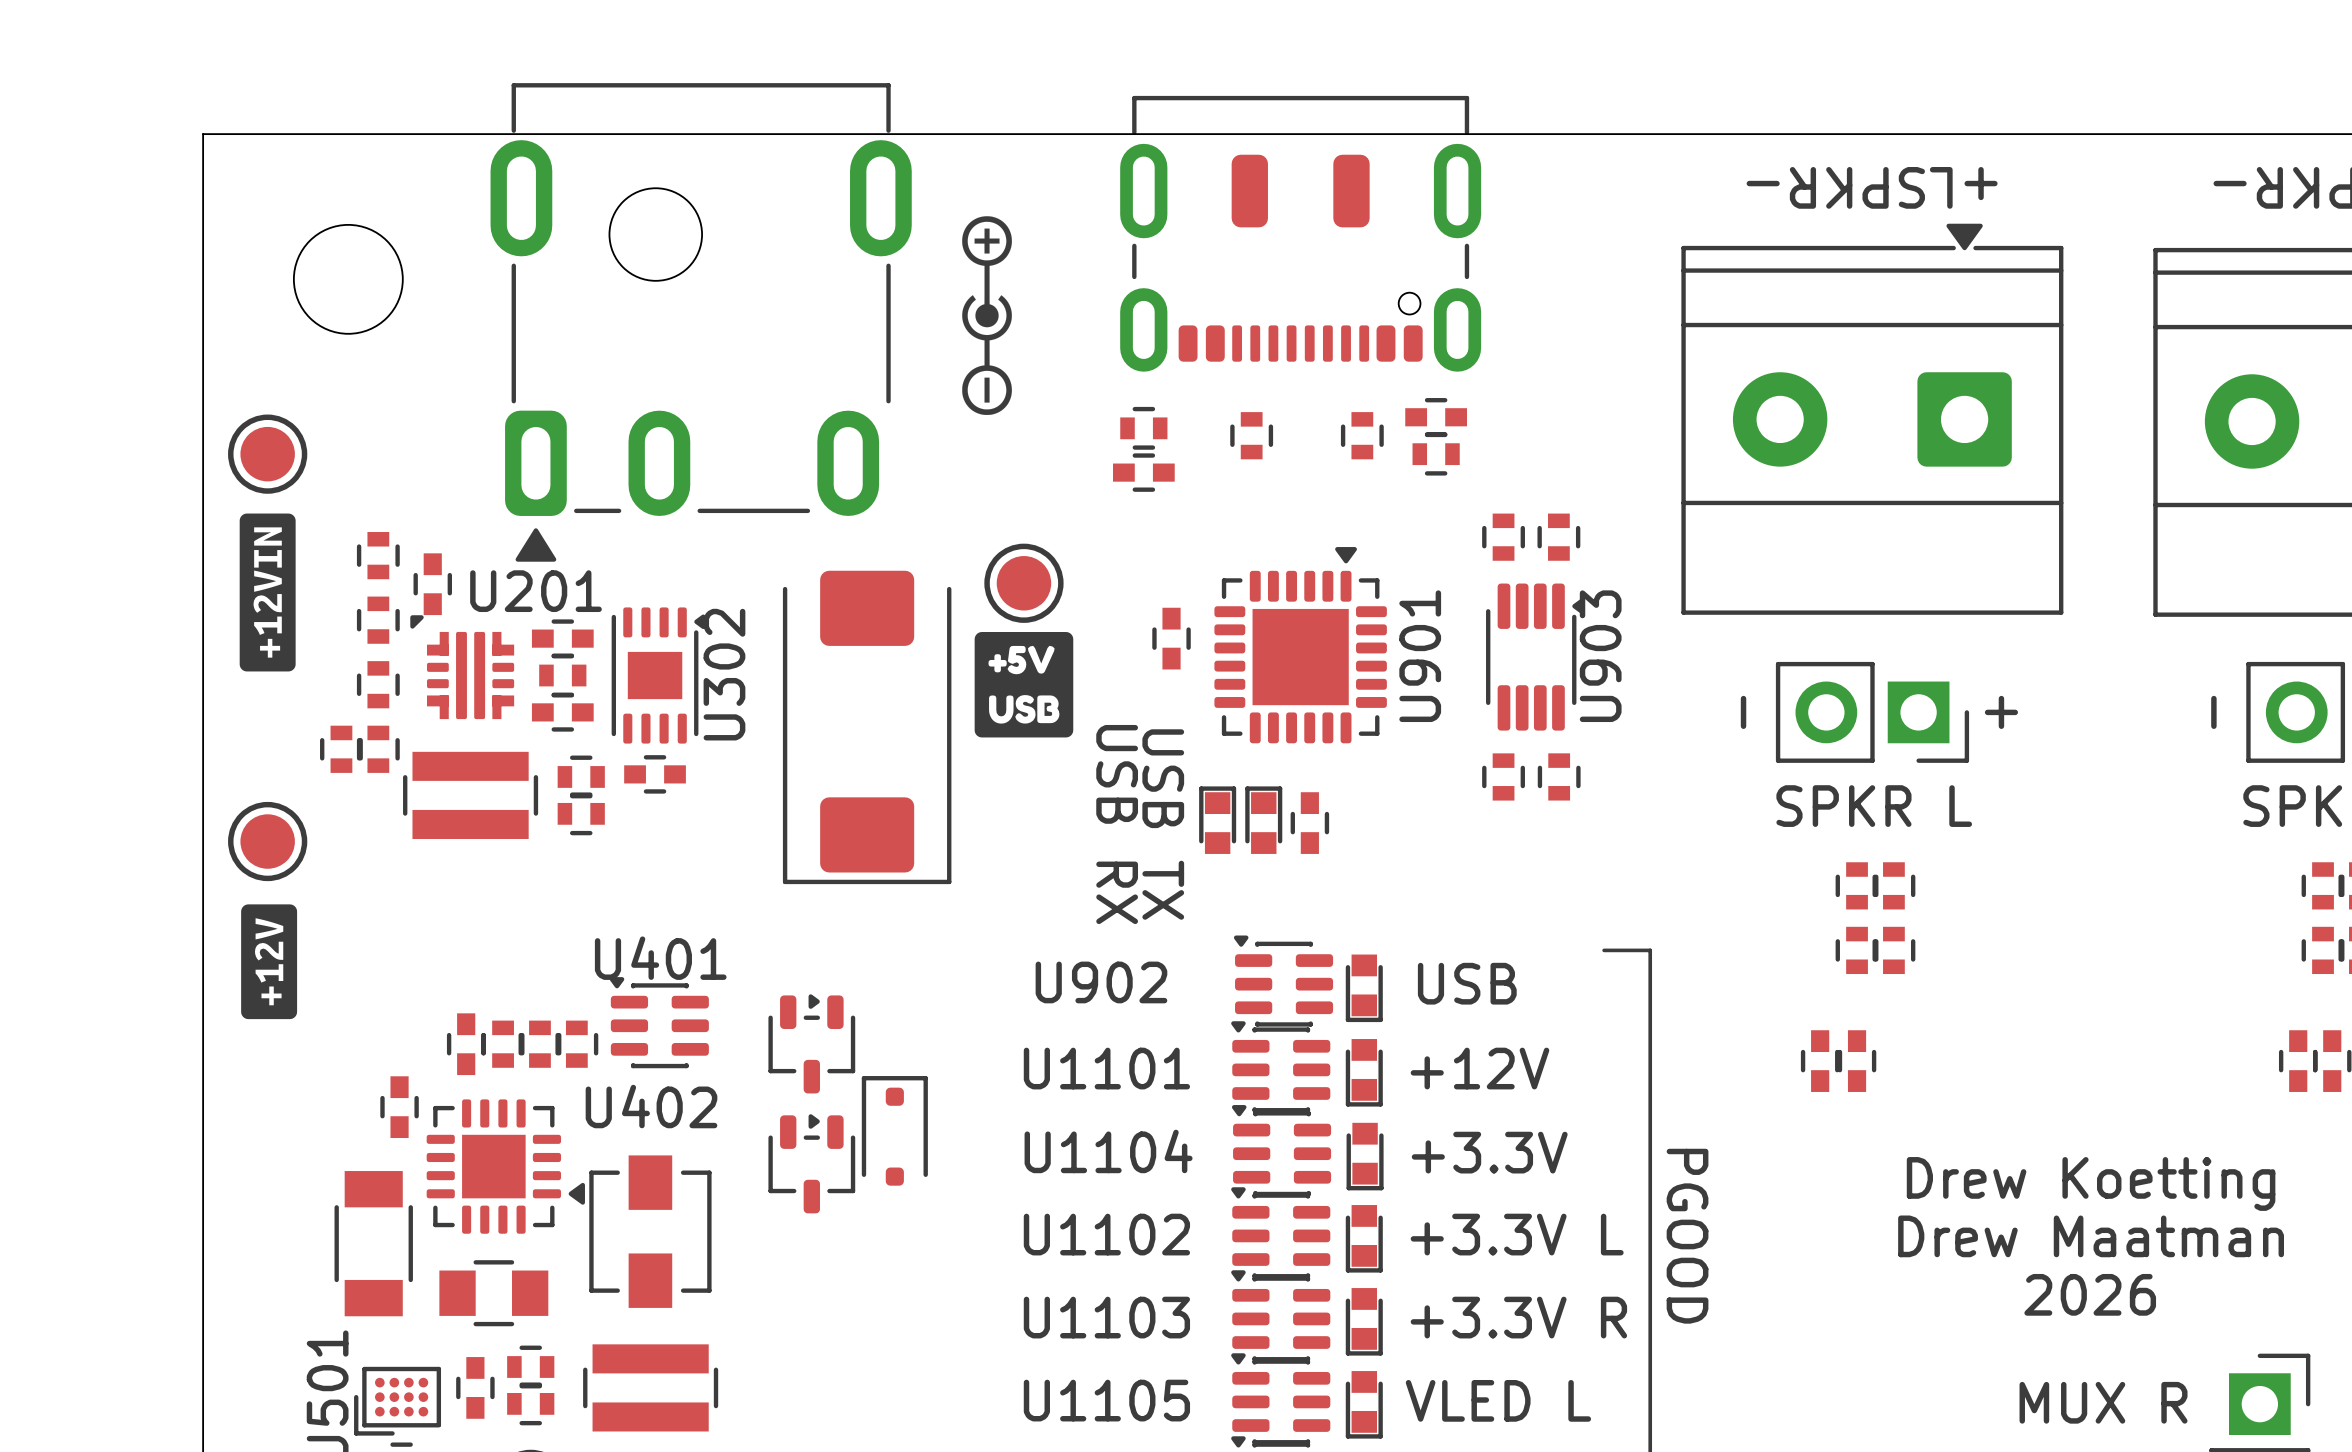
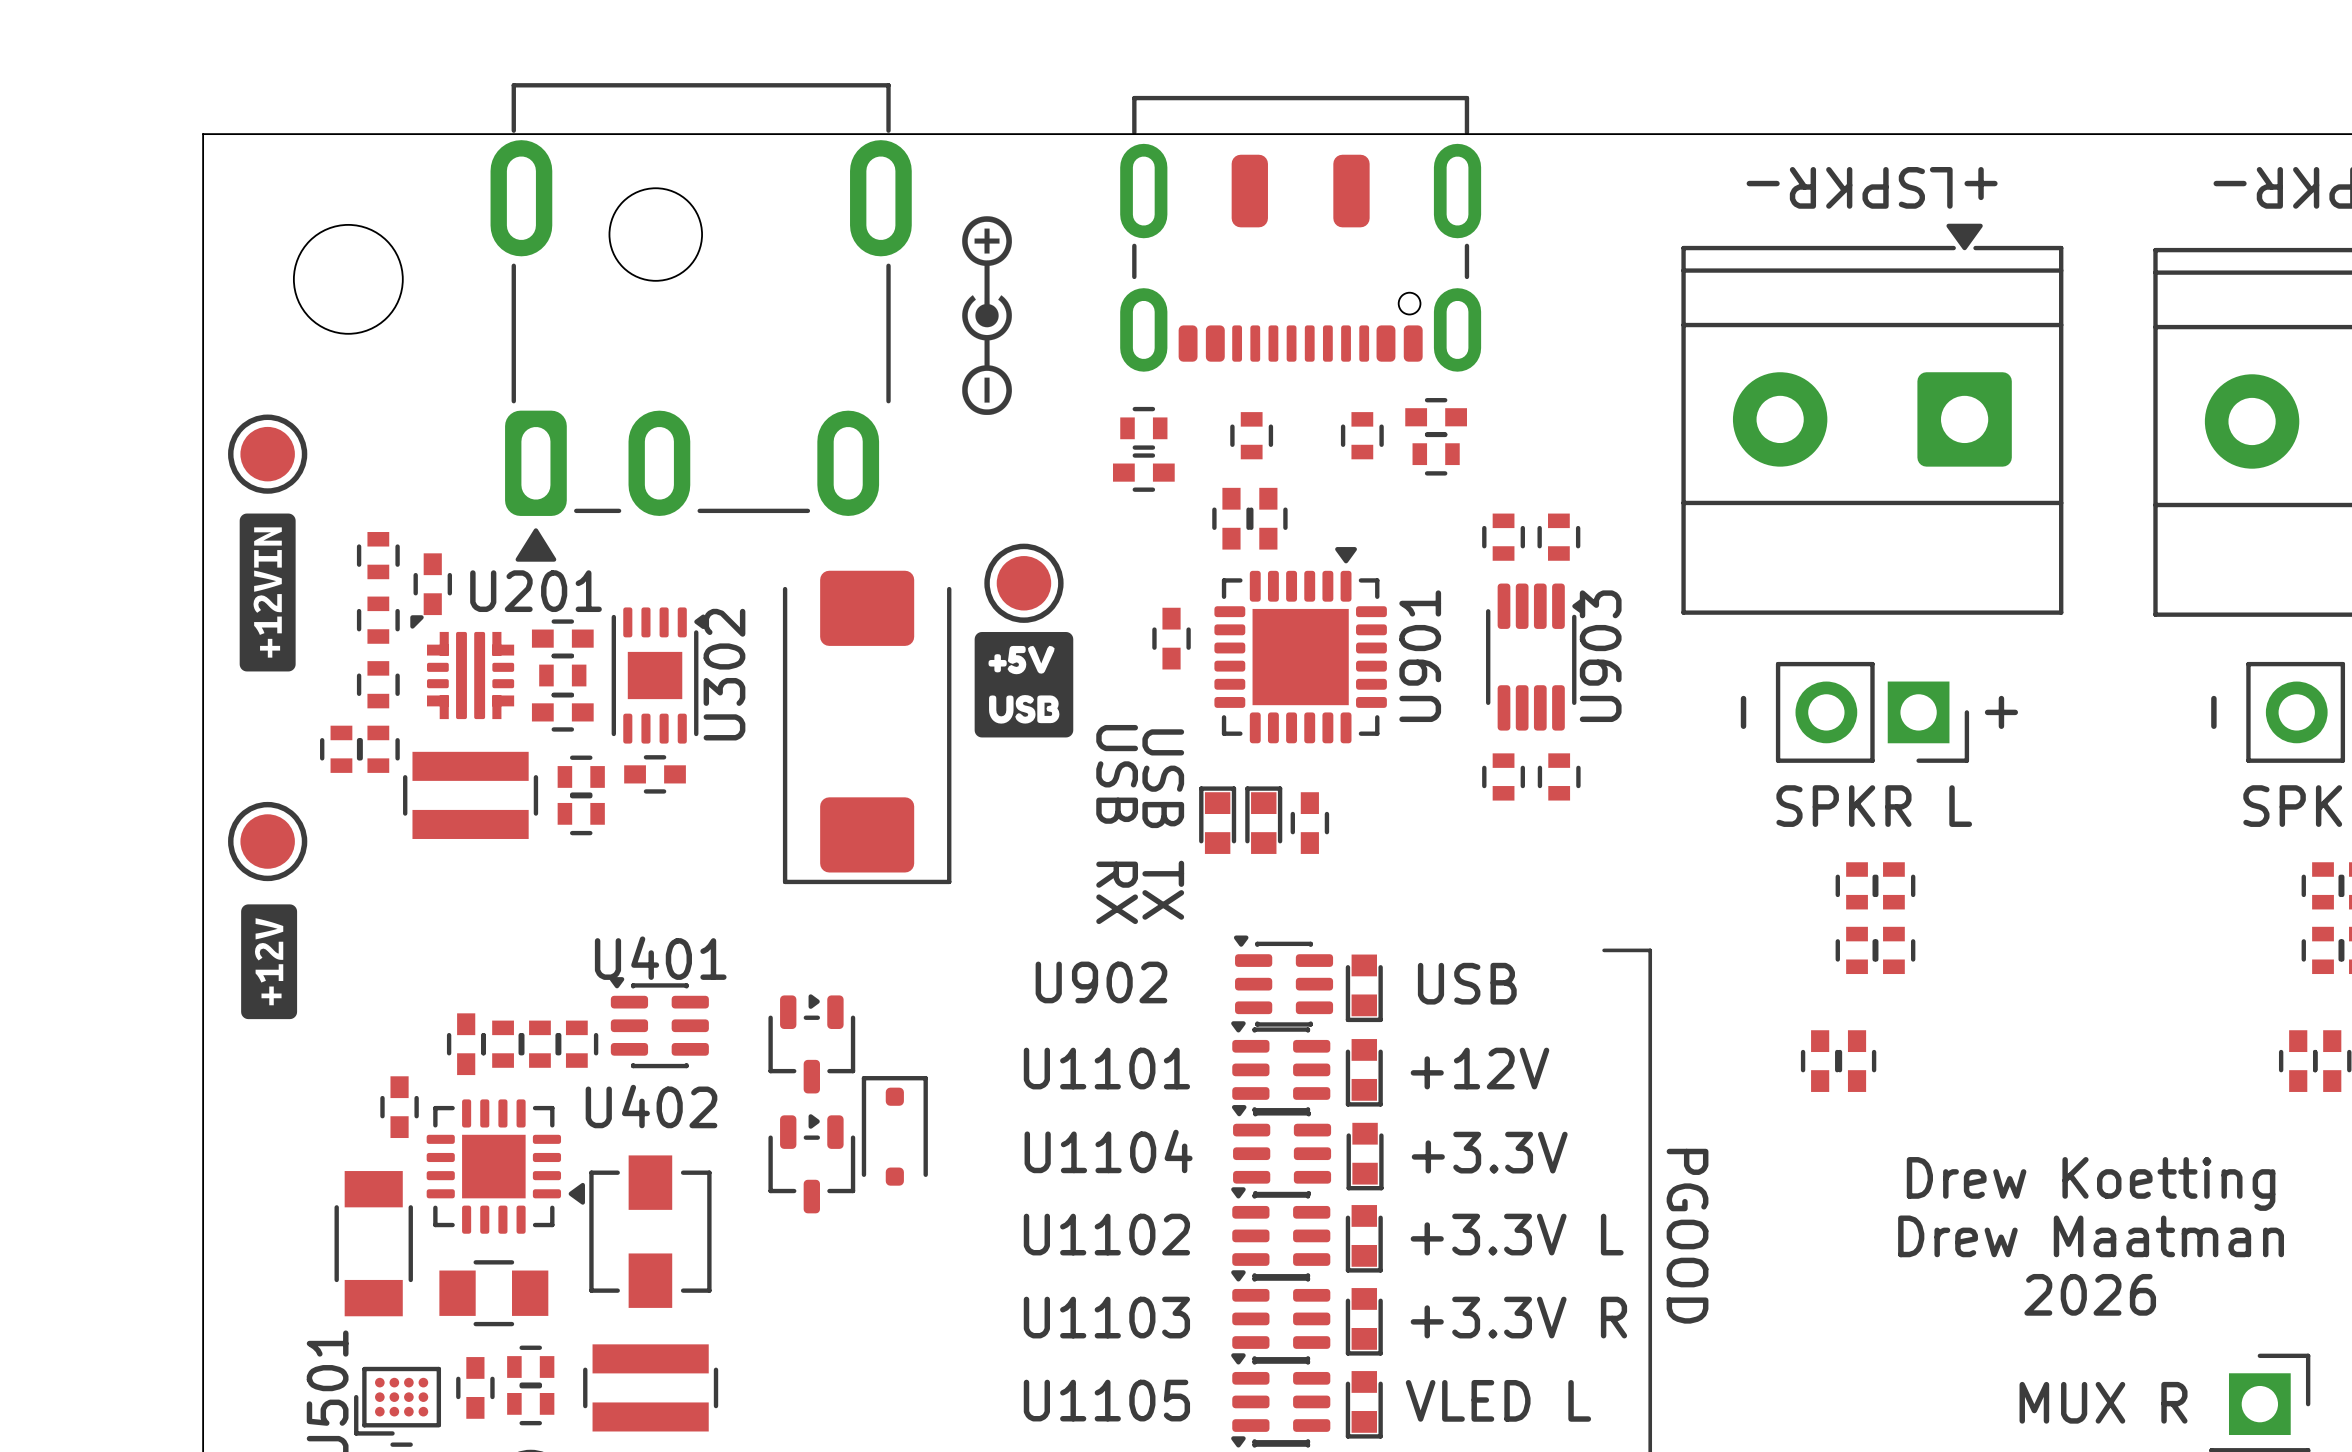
part: none -> (1231, 518)
part: none -> (1268, 518)

